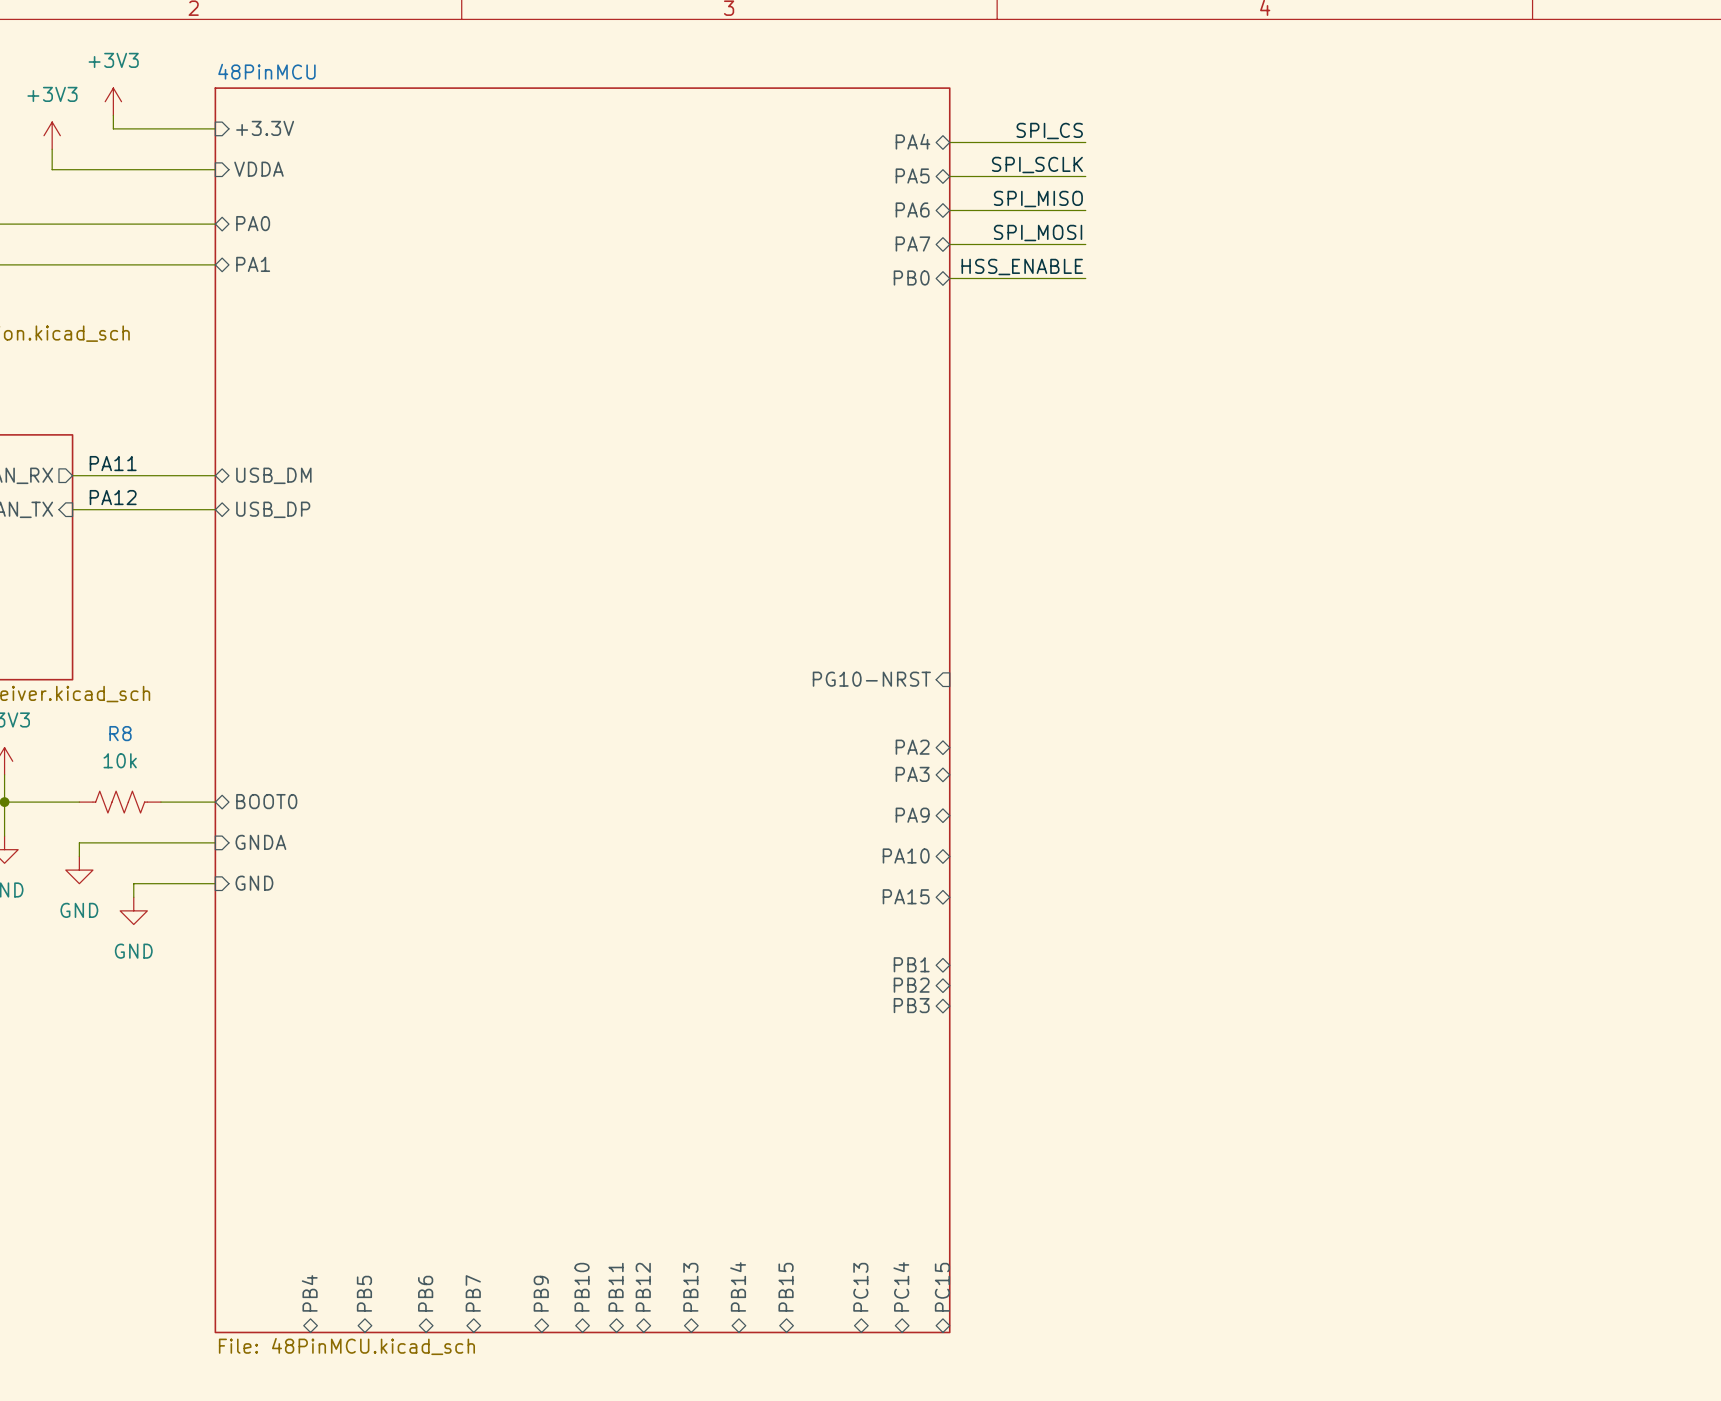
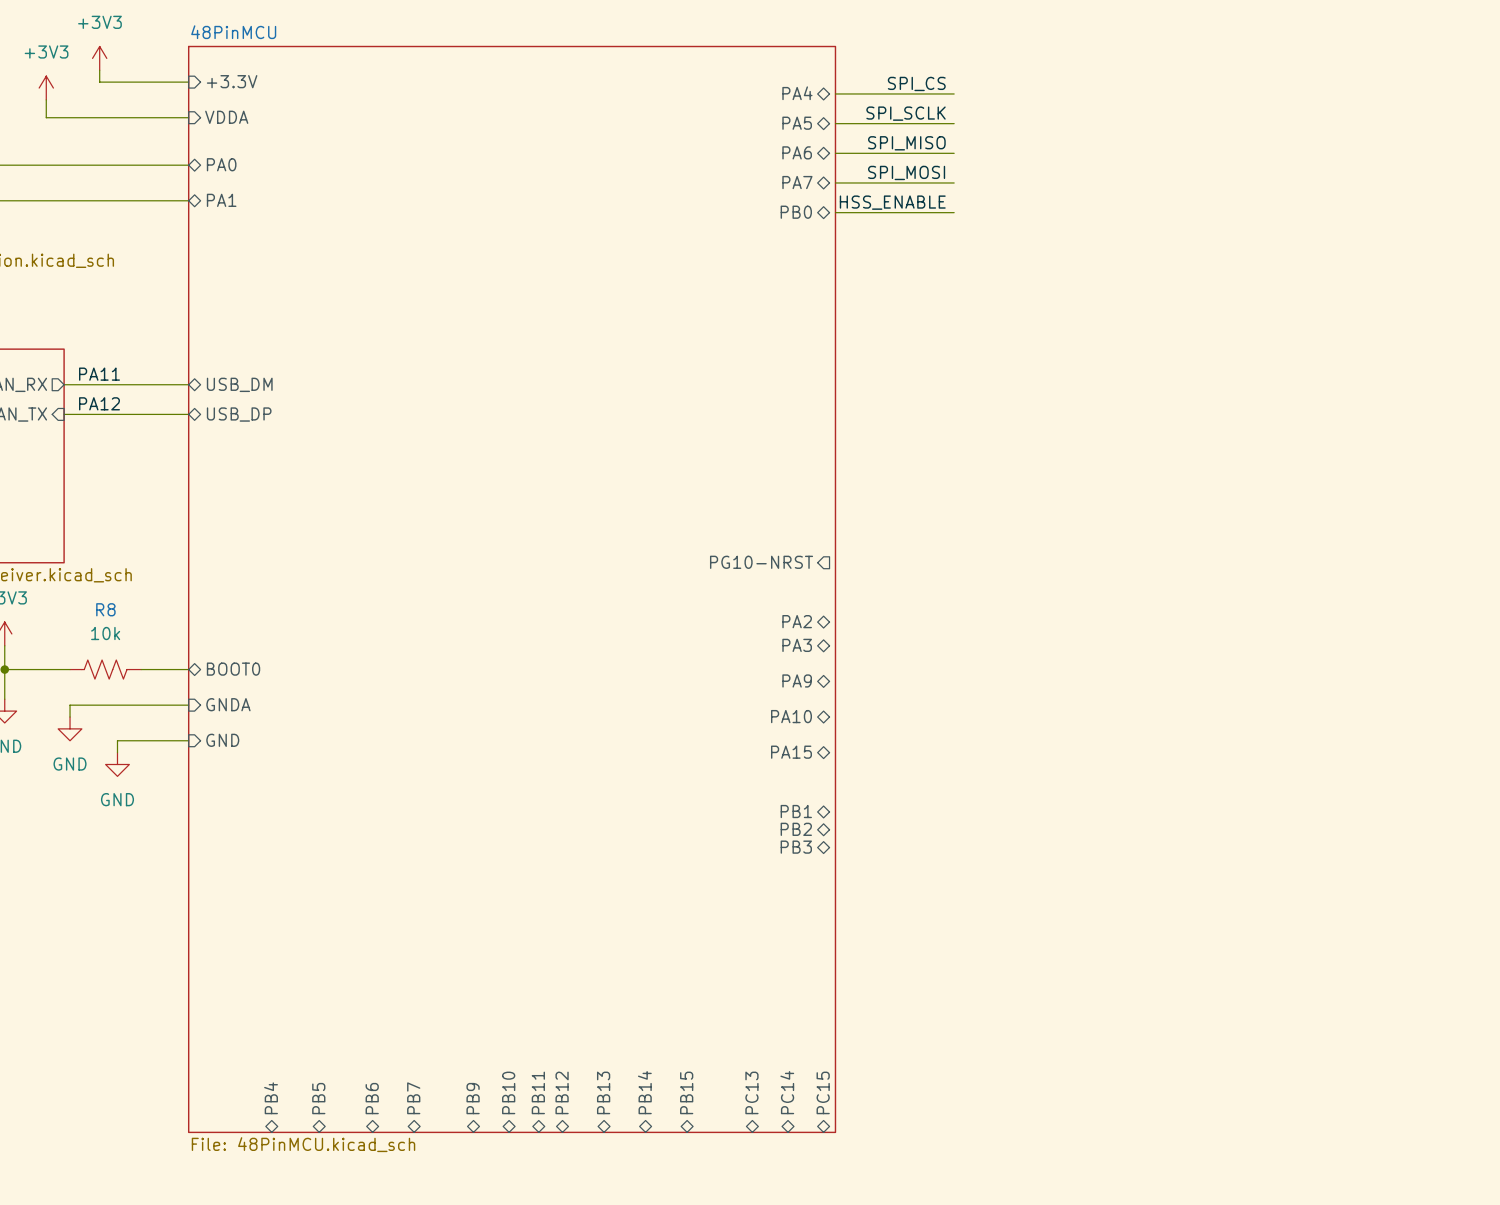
sheet 48PinMCU shape: [214, 87, 951, 1334] -> [187, 45, 837, 1134]
wire: (949, 142) (956, 142) -> (948, 93) (954, 93)
wire: (949, 176) (956, 176) -> (948, 123) (954, 123)
wire: (949, 210) (956, 210) -> (948, 153) (954, 153)
wire: (949, 244) (956, 244) -> (948, 182) (954, 182)
wire: (949, 278) (956, 278) -> (948, 212) (954, 212)

